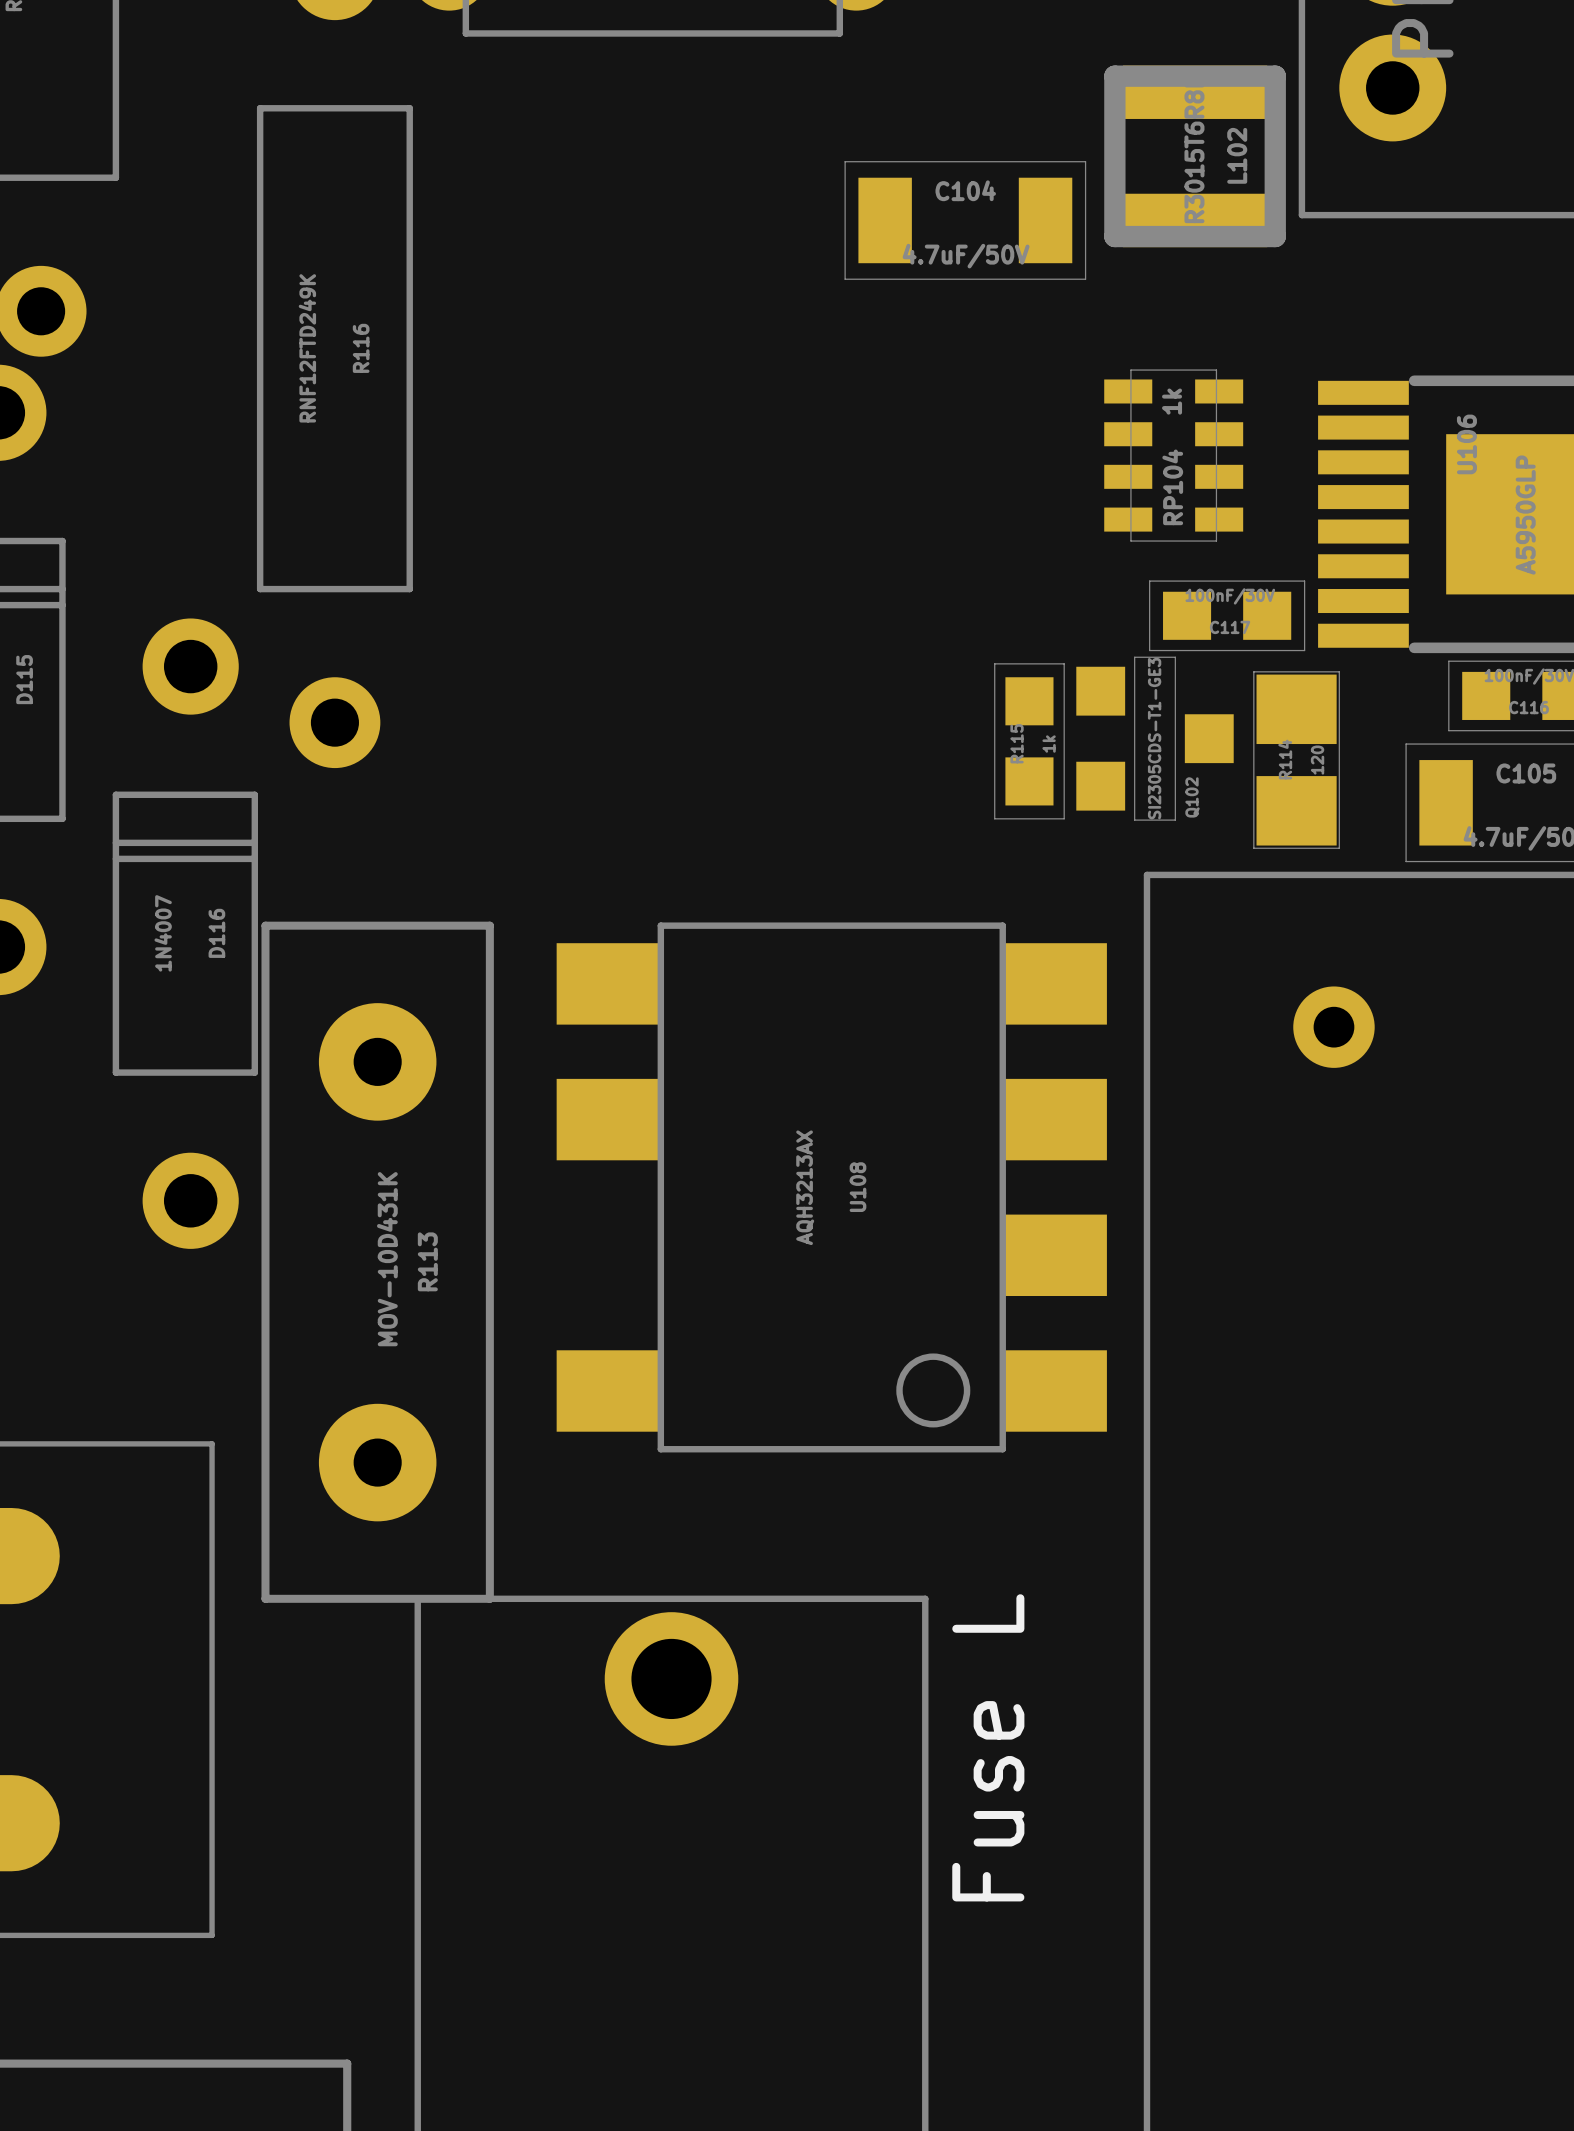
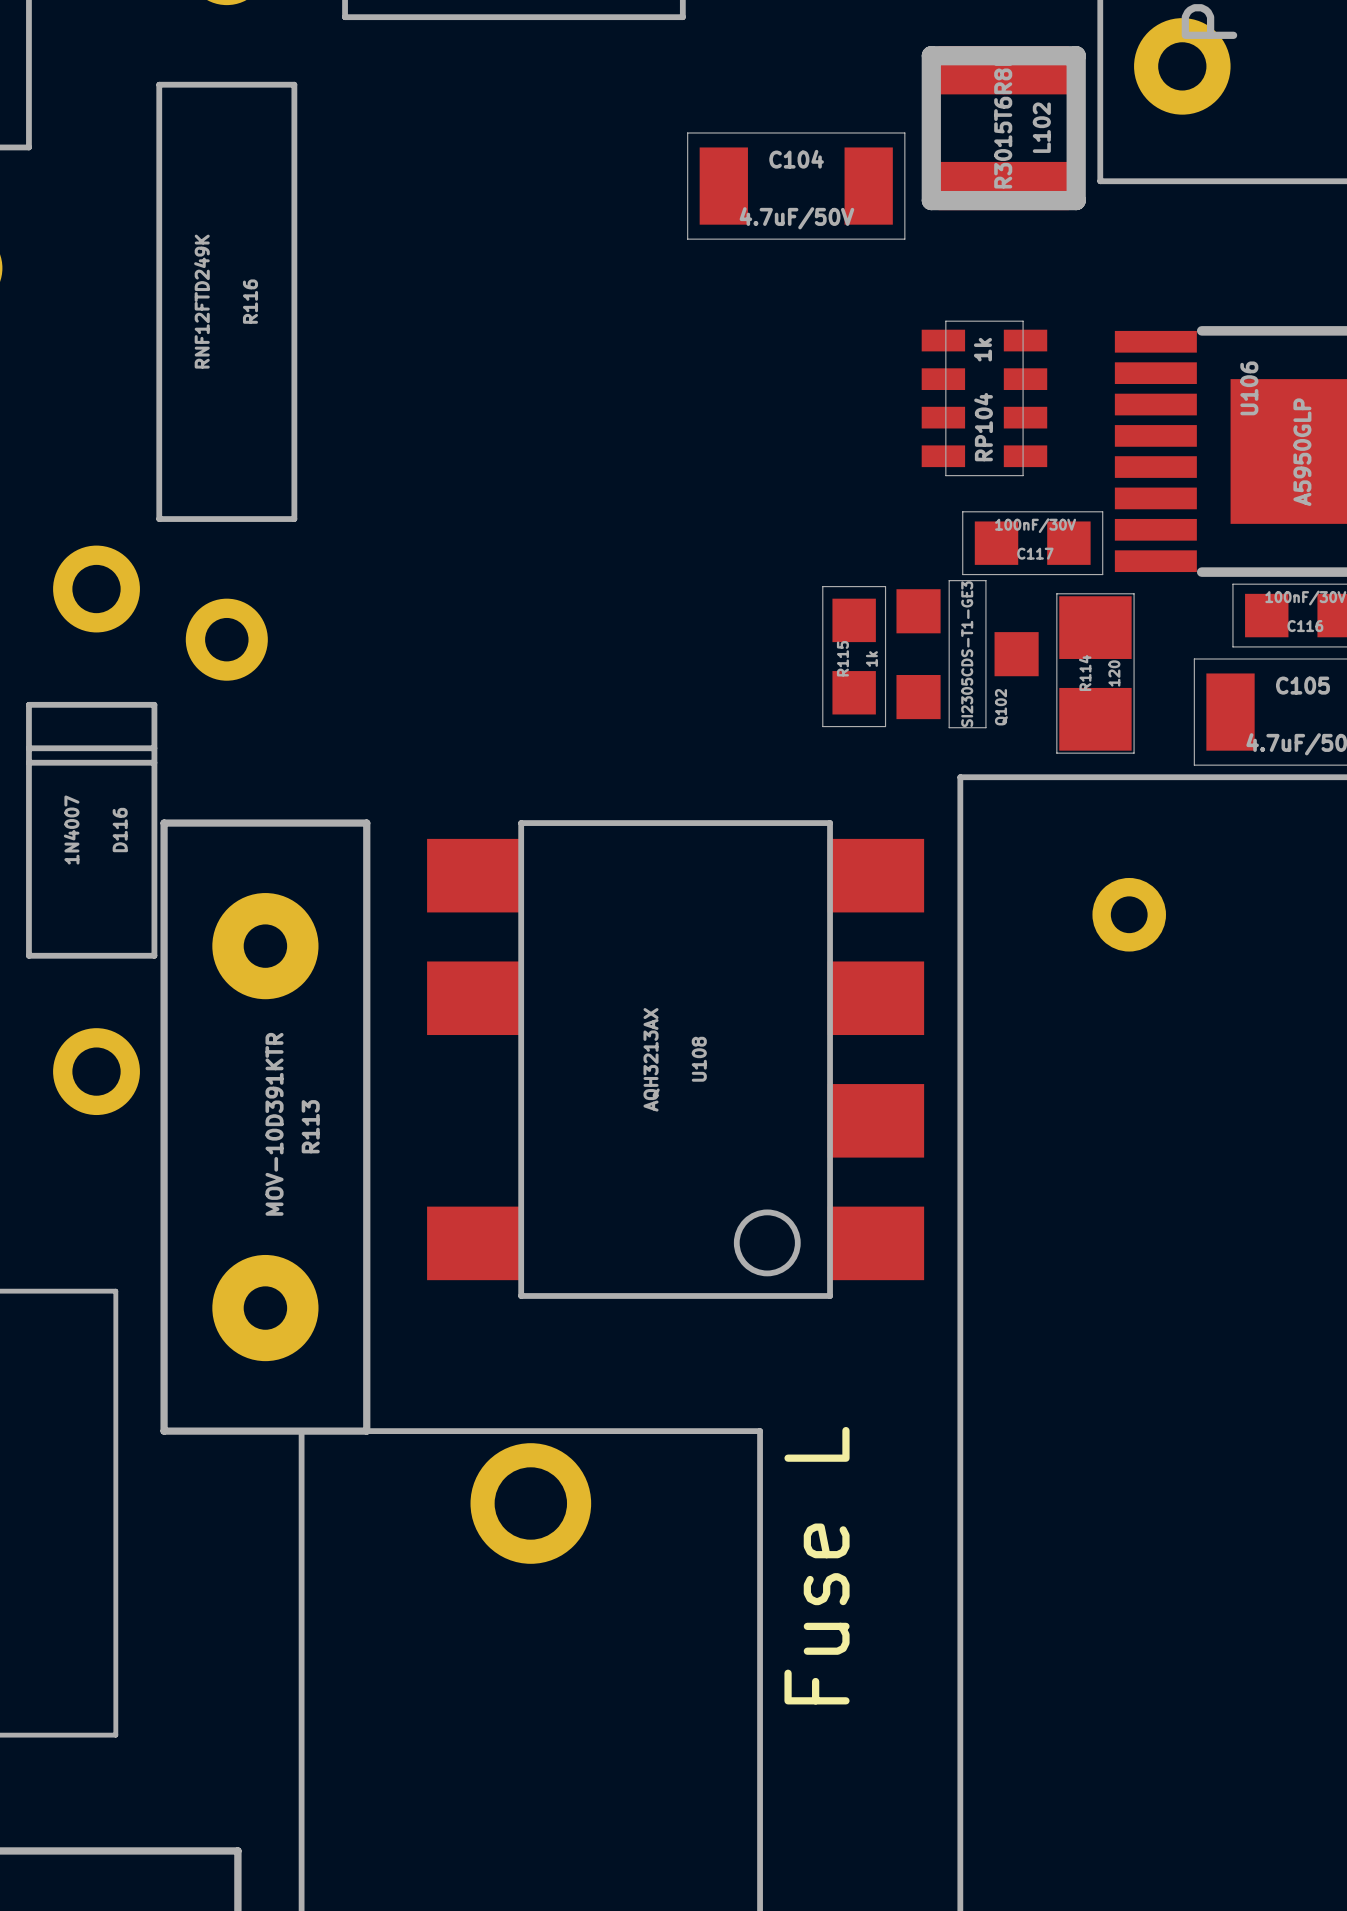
R113 value: MOV-10D431K (387, 1259) -> MOV-10D391KTR (274, 1124)

